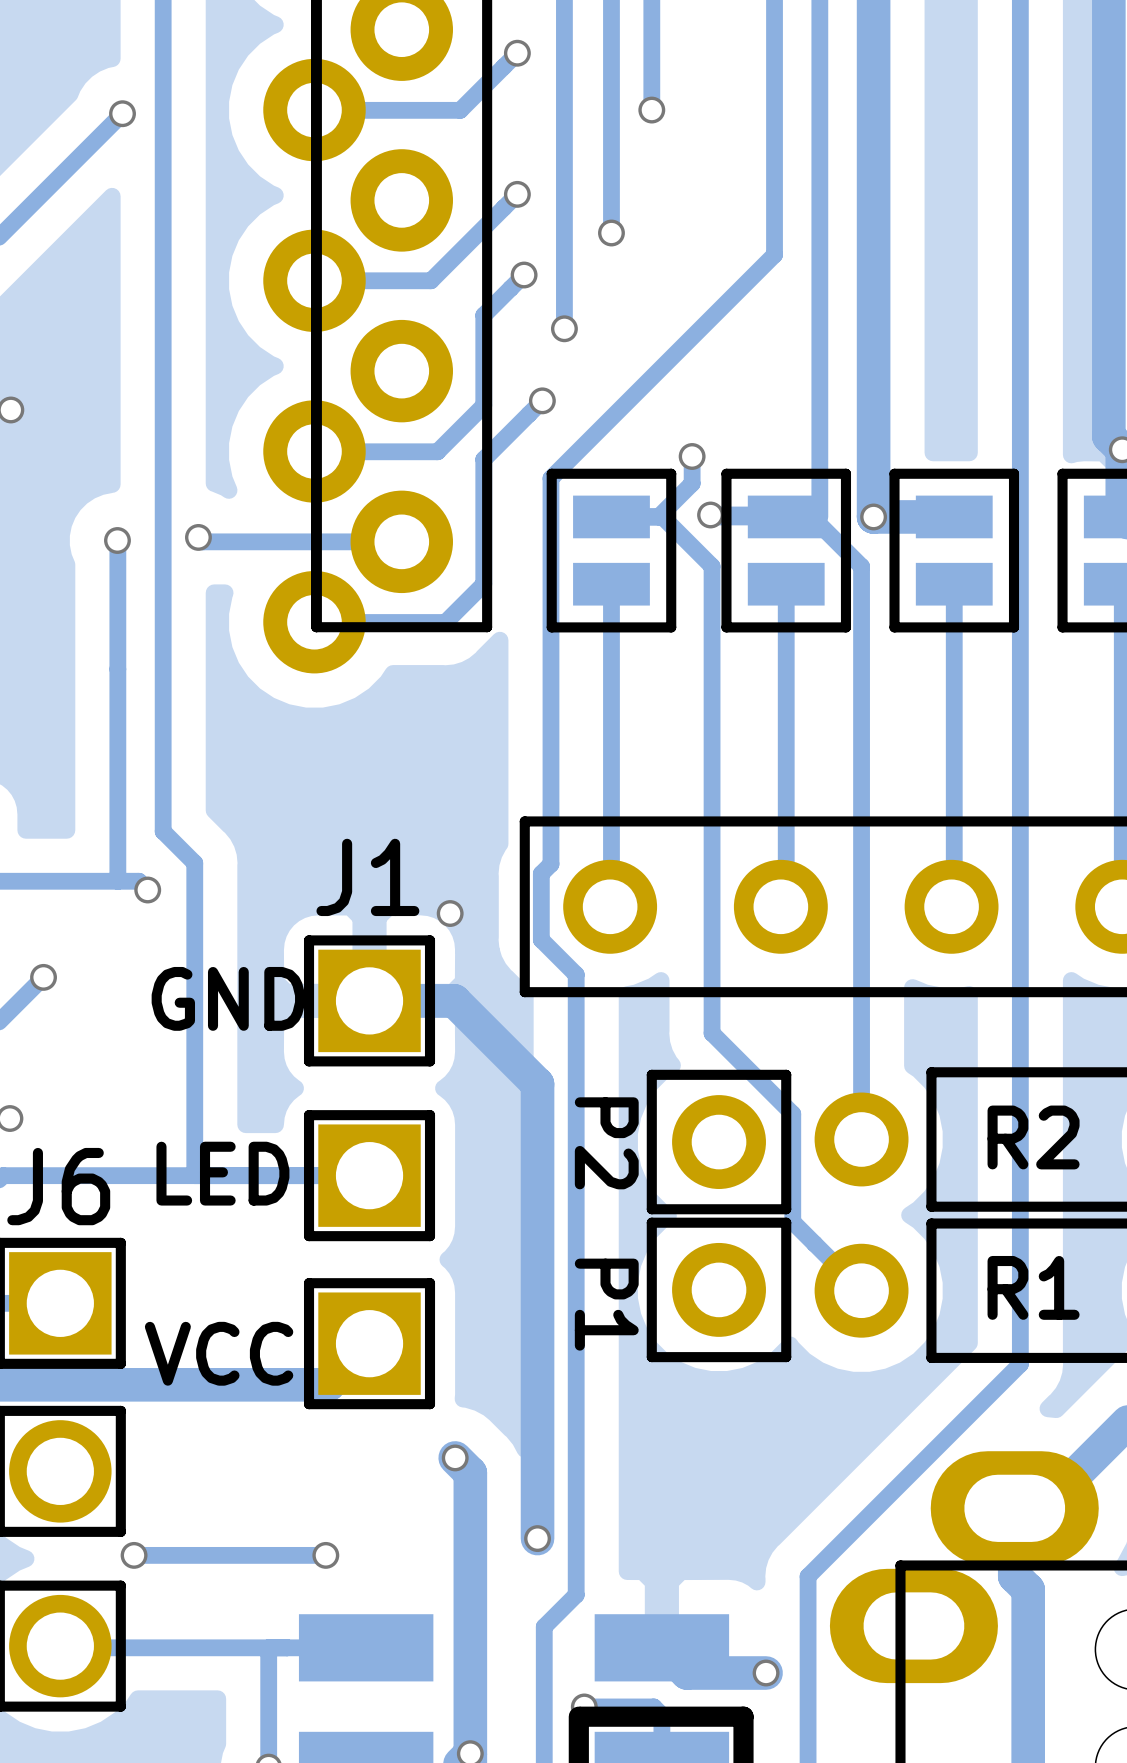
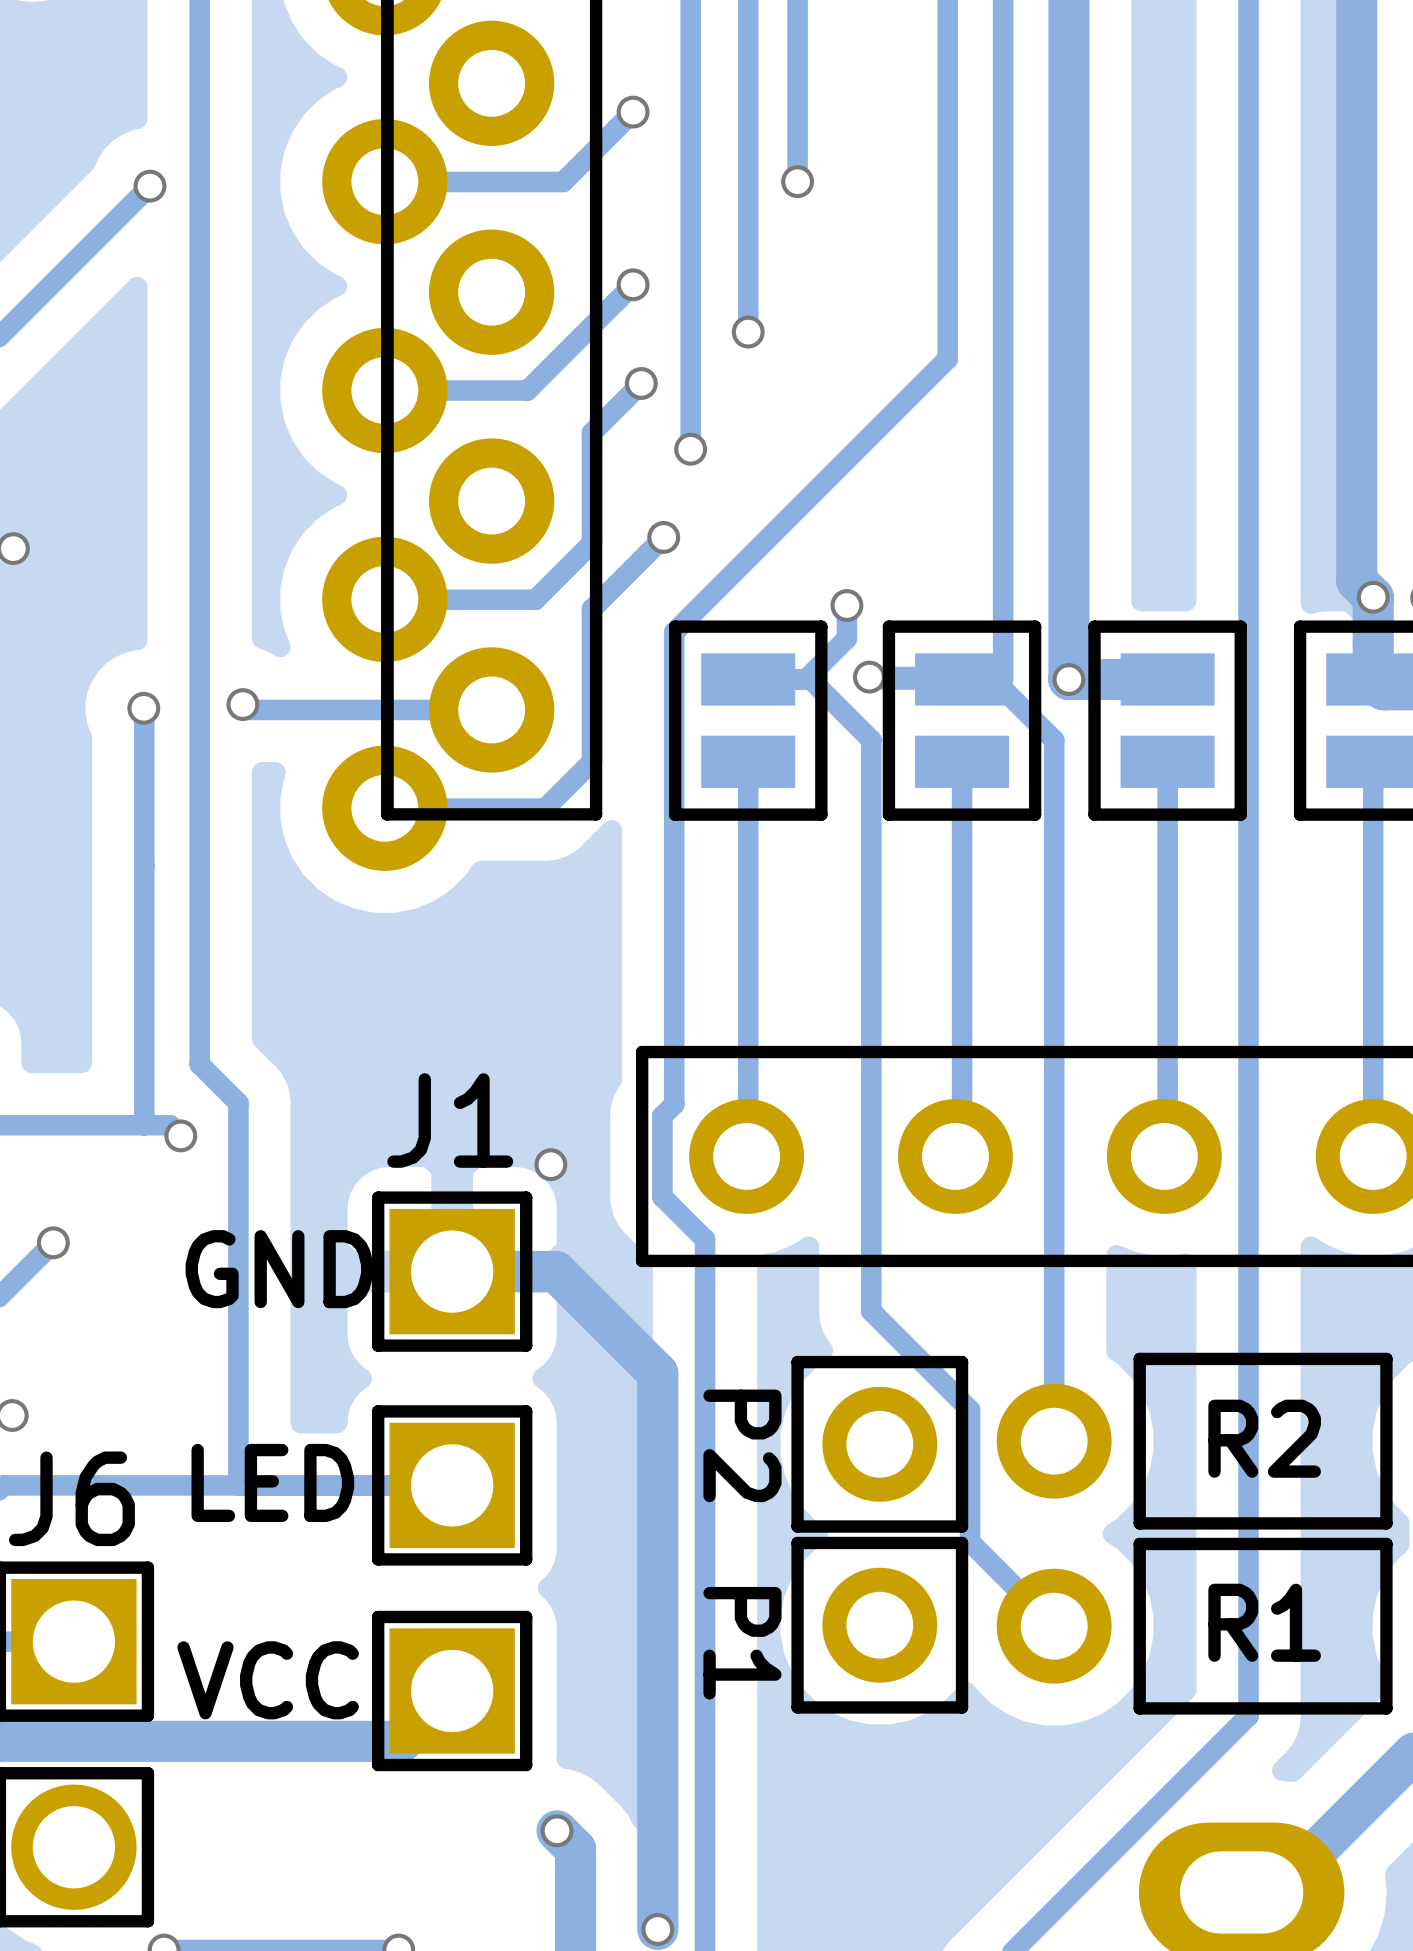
part text position: VCC (219, 1353) -> VCC (268, 1680)

